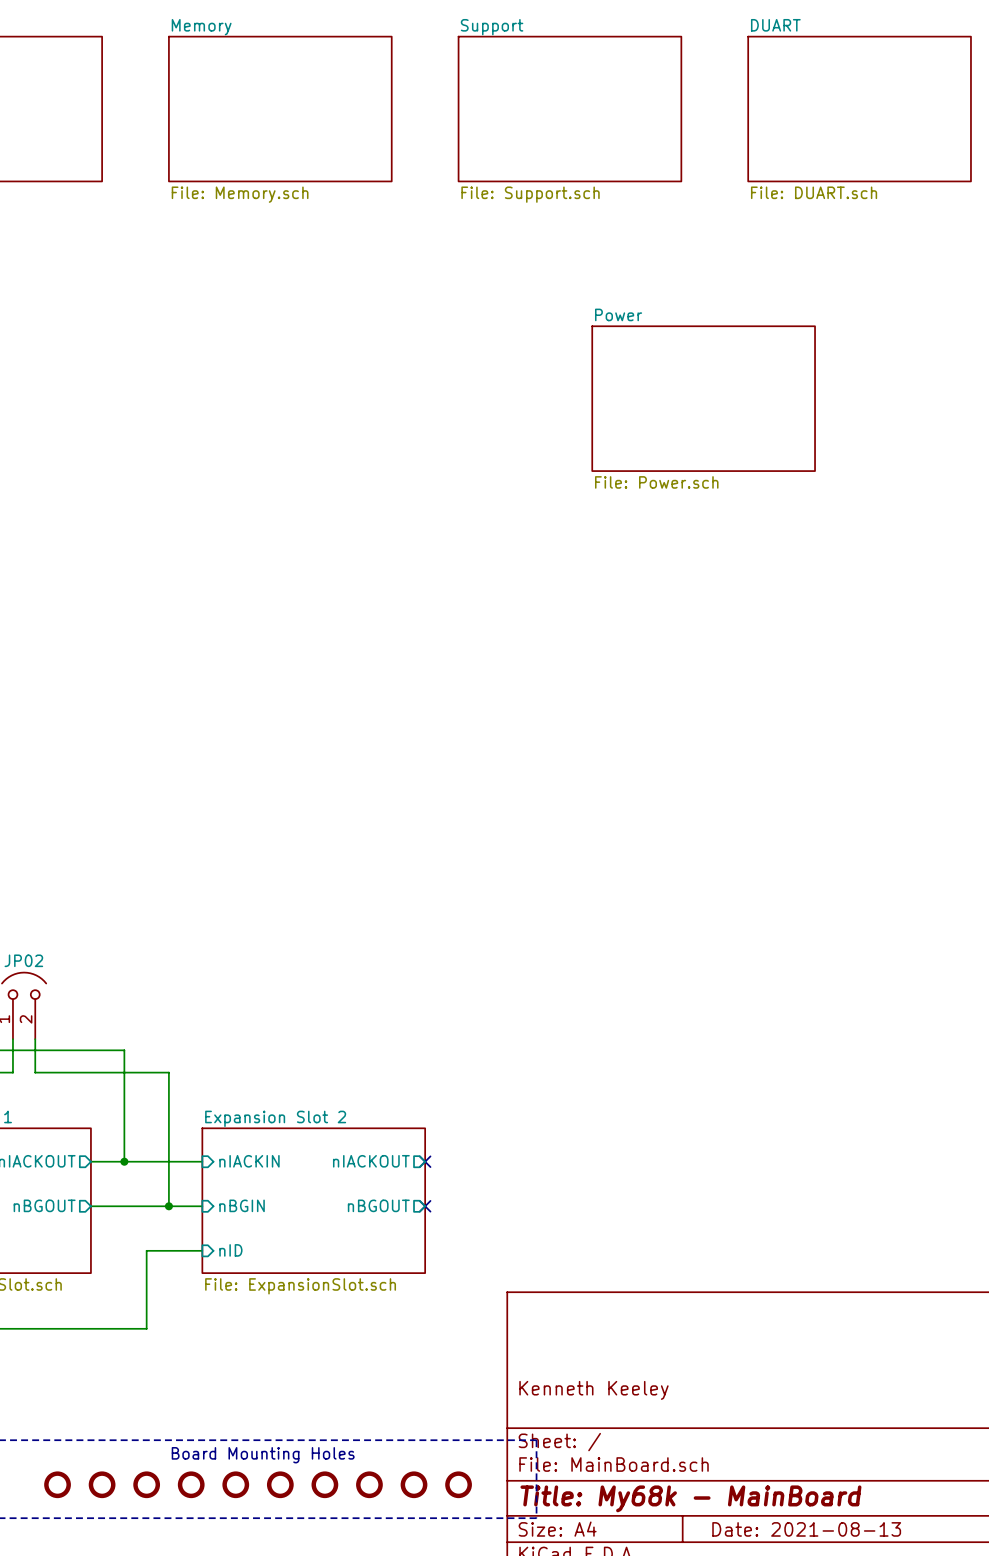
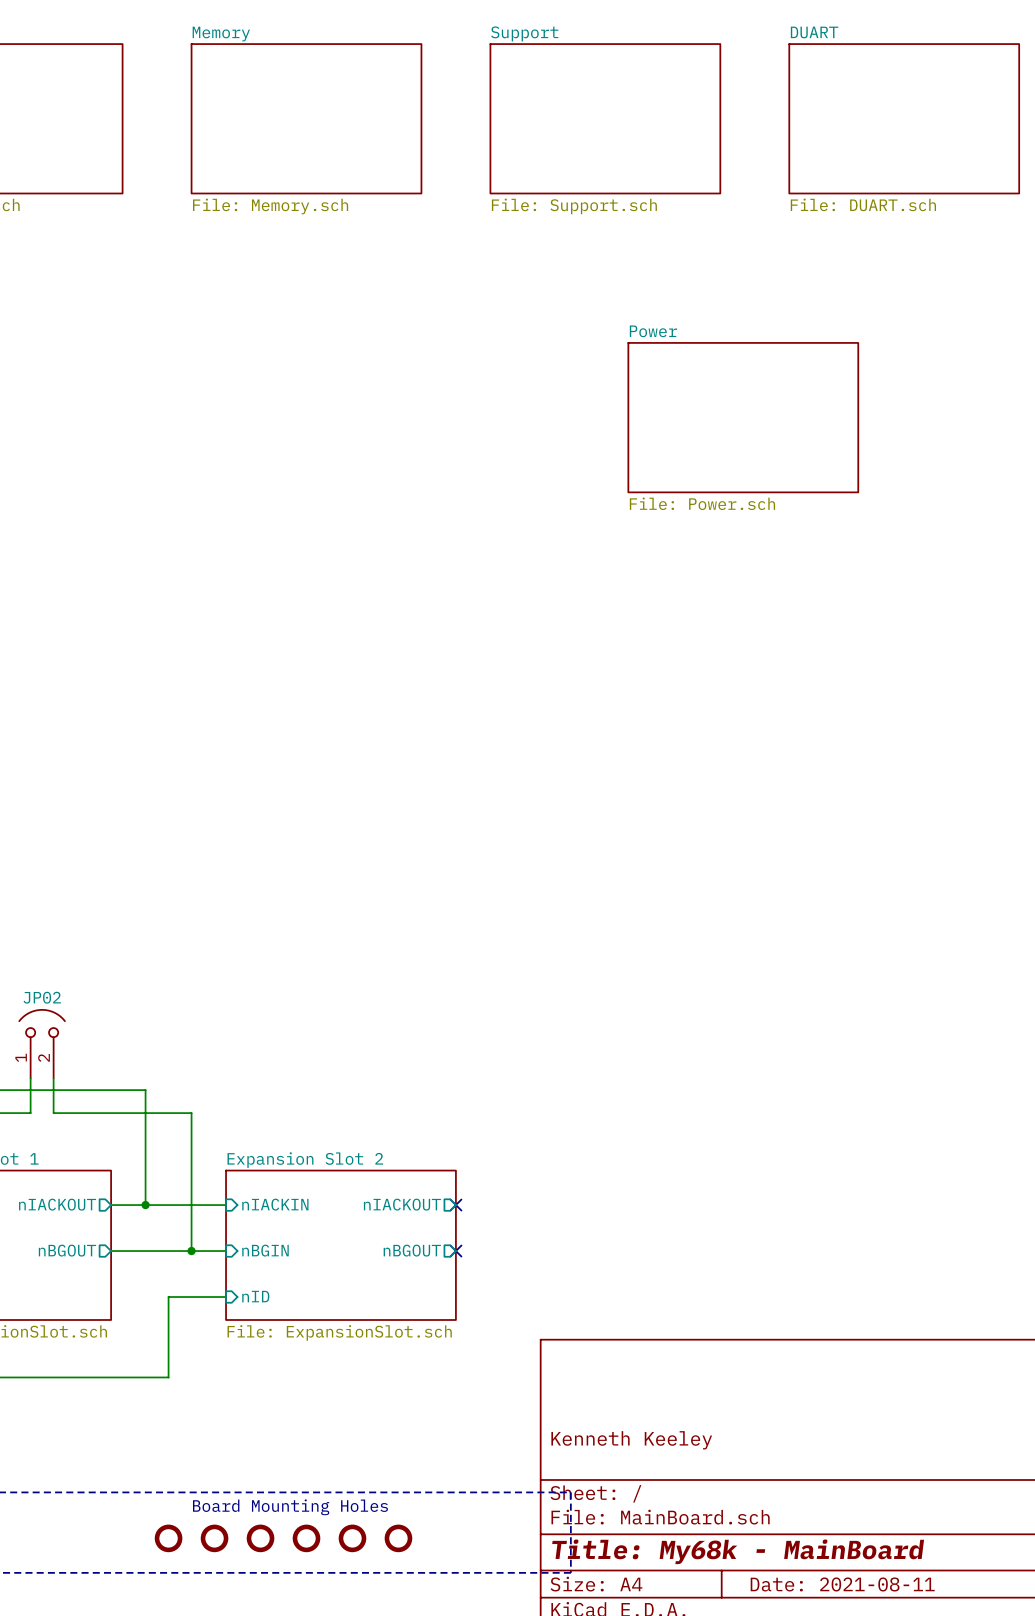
part: (57, 1484) -> none
part: (102, 1484) -> none
part: (414, 1484) -> none
part: (458, 1484) -> none
title block: Date: 2021-08-13 (806, 1529) -> Date: 2021-08-11 (842, 1584)

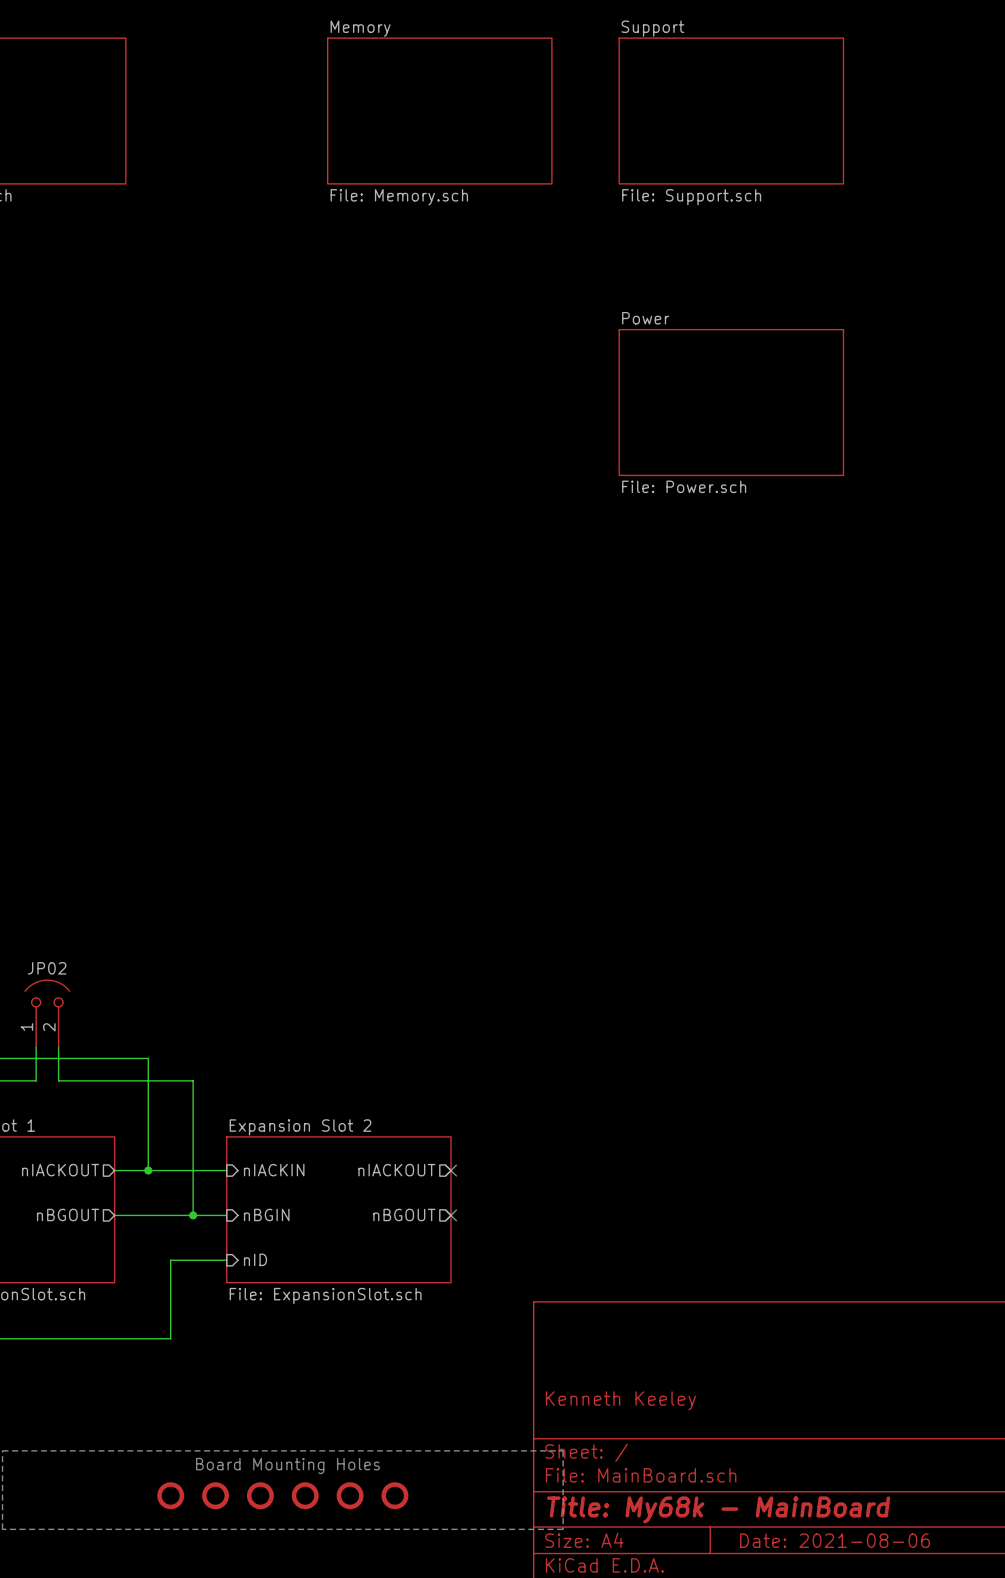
sheet Memory position: (306, 118) -> (439, 111)
sheet Support position: (605, 118) -> (731, 111)
sheet DUART: File: DUART.sch (904, 118) -> none
title block: Date: 2021-08-11 (842, 1584) -> Date: 2021-08-06 (835, 1540)

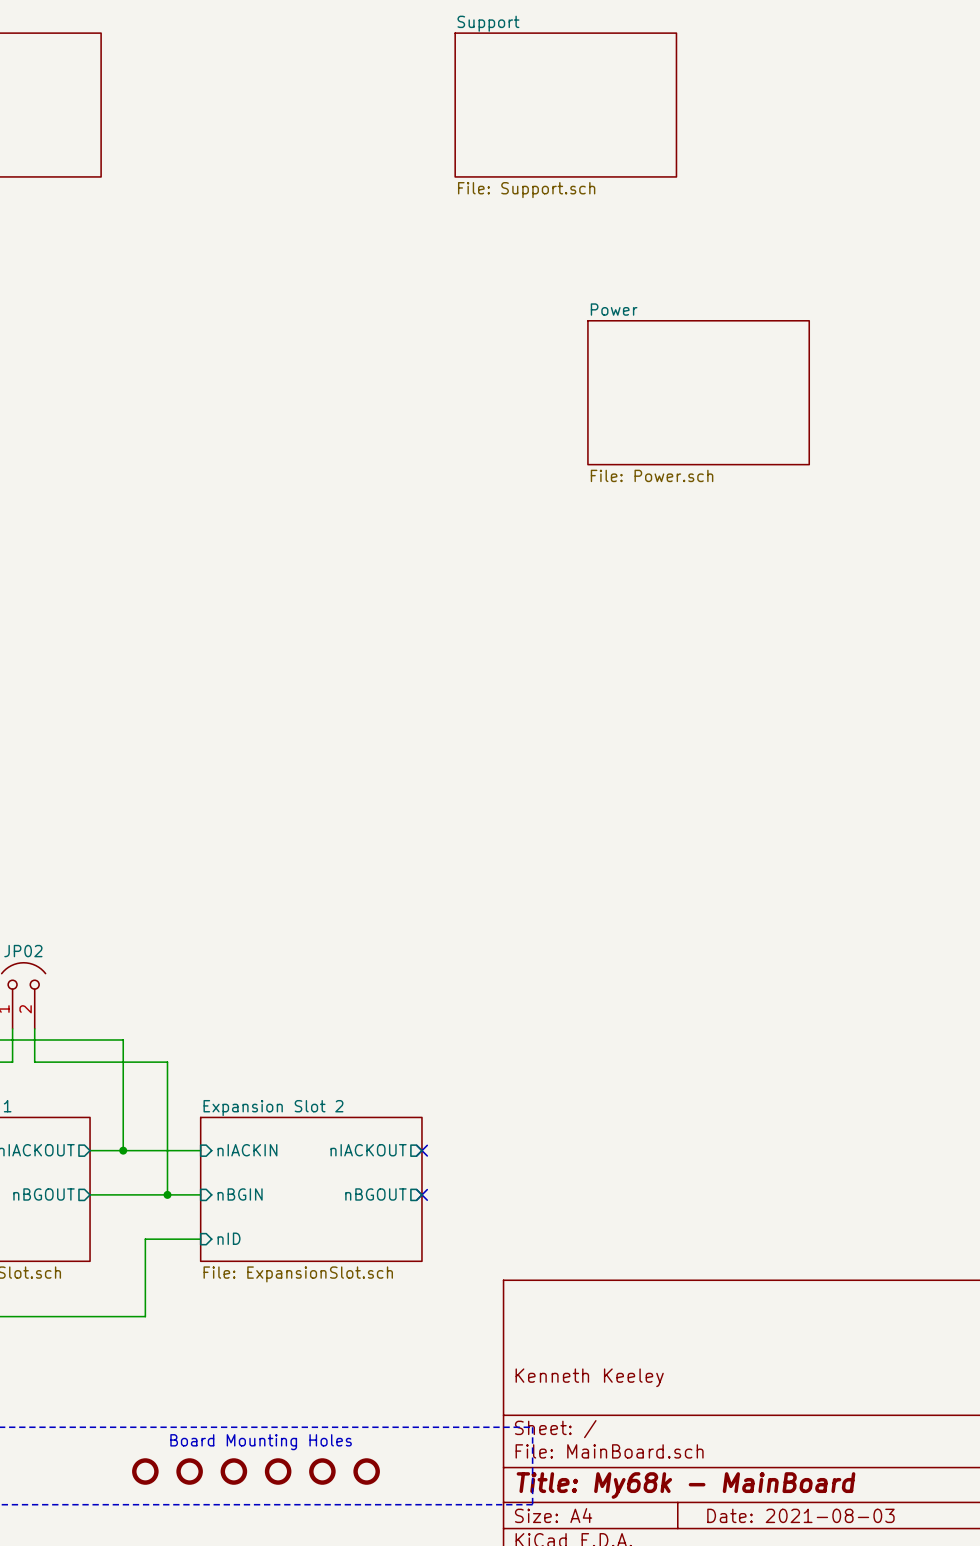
sheet Memory: File: Memory.sch (439, 111) -> none
sheet Support position: (731, 111) -> (565, 105)
title block: Date: 2021-08-06 (835, 1540) -> Date: 2021-08-03 (800, 1515)

